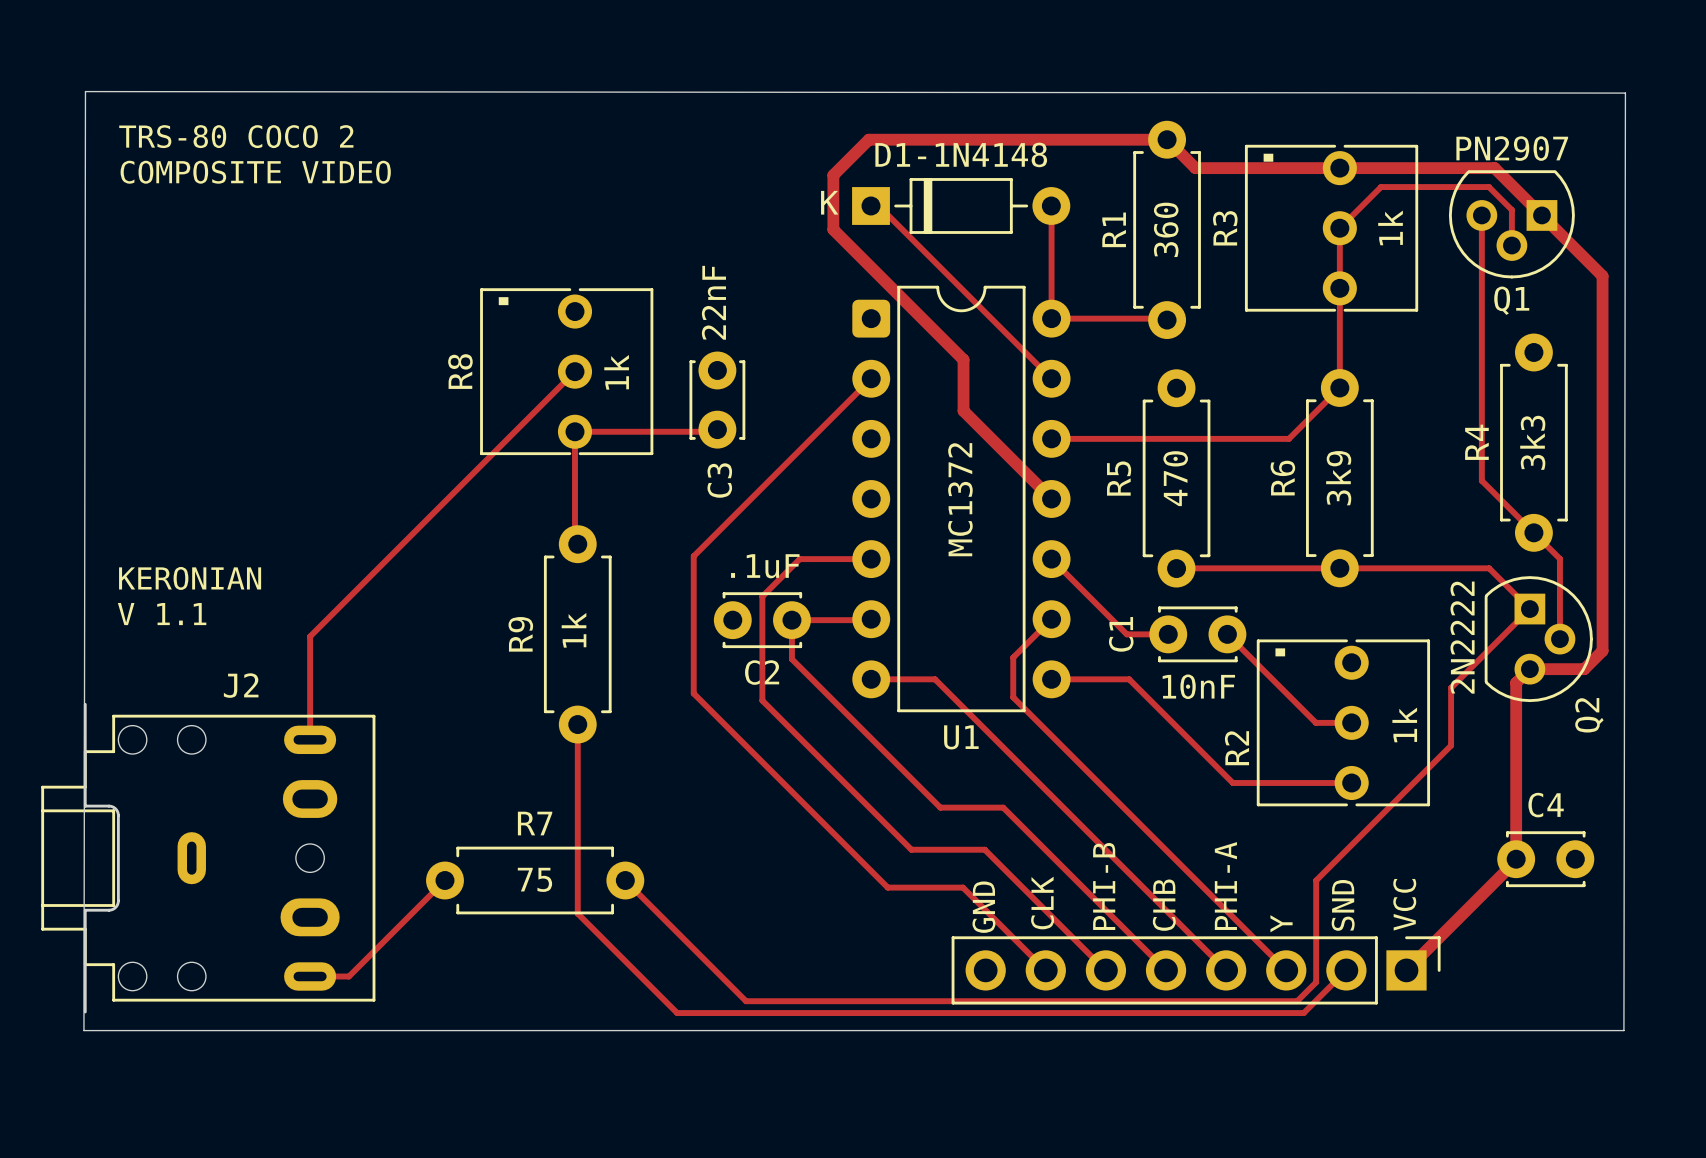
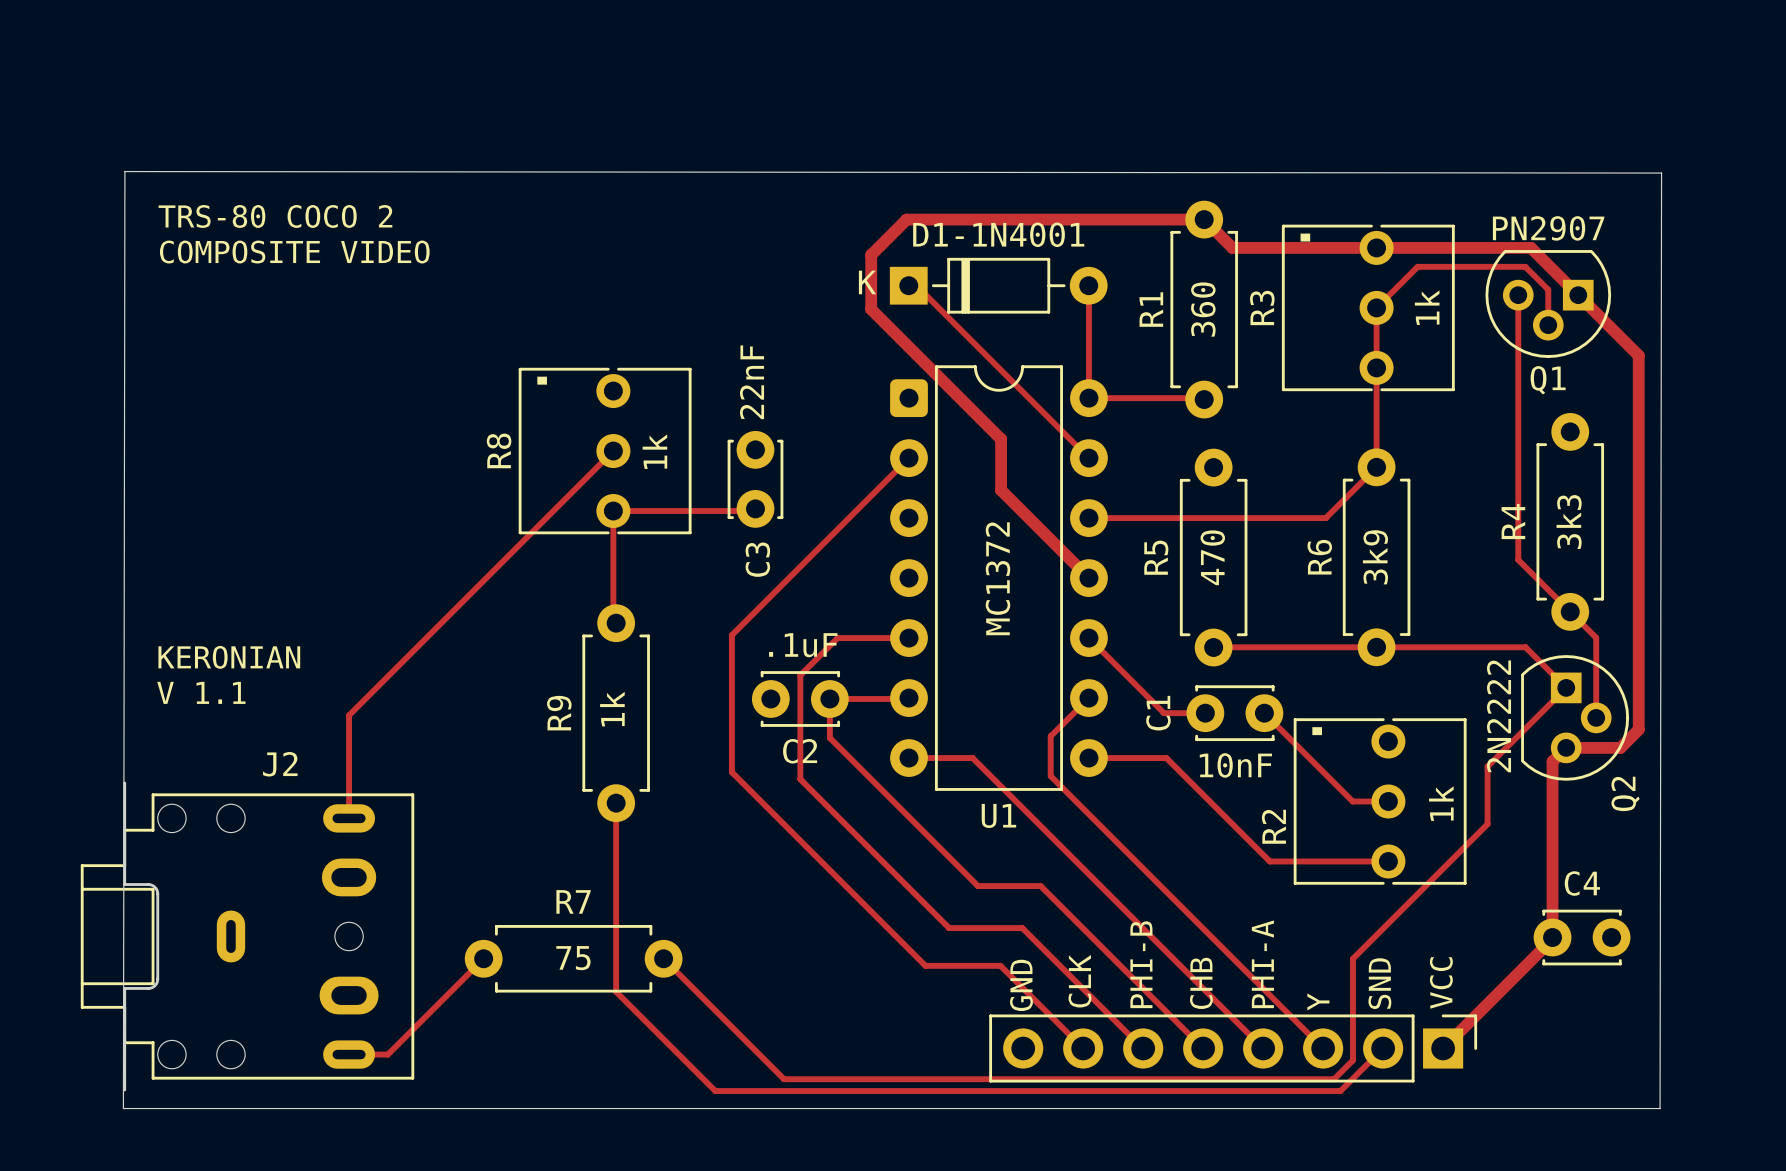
D1-1N4148 name: D1-1N4148 (961, 154) -> D1-1N4001 (998, 234)

